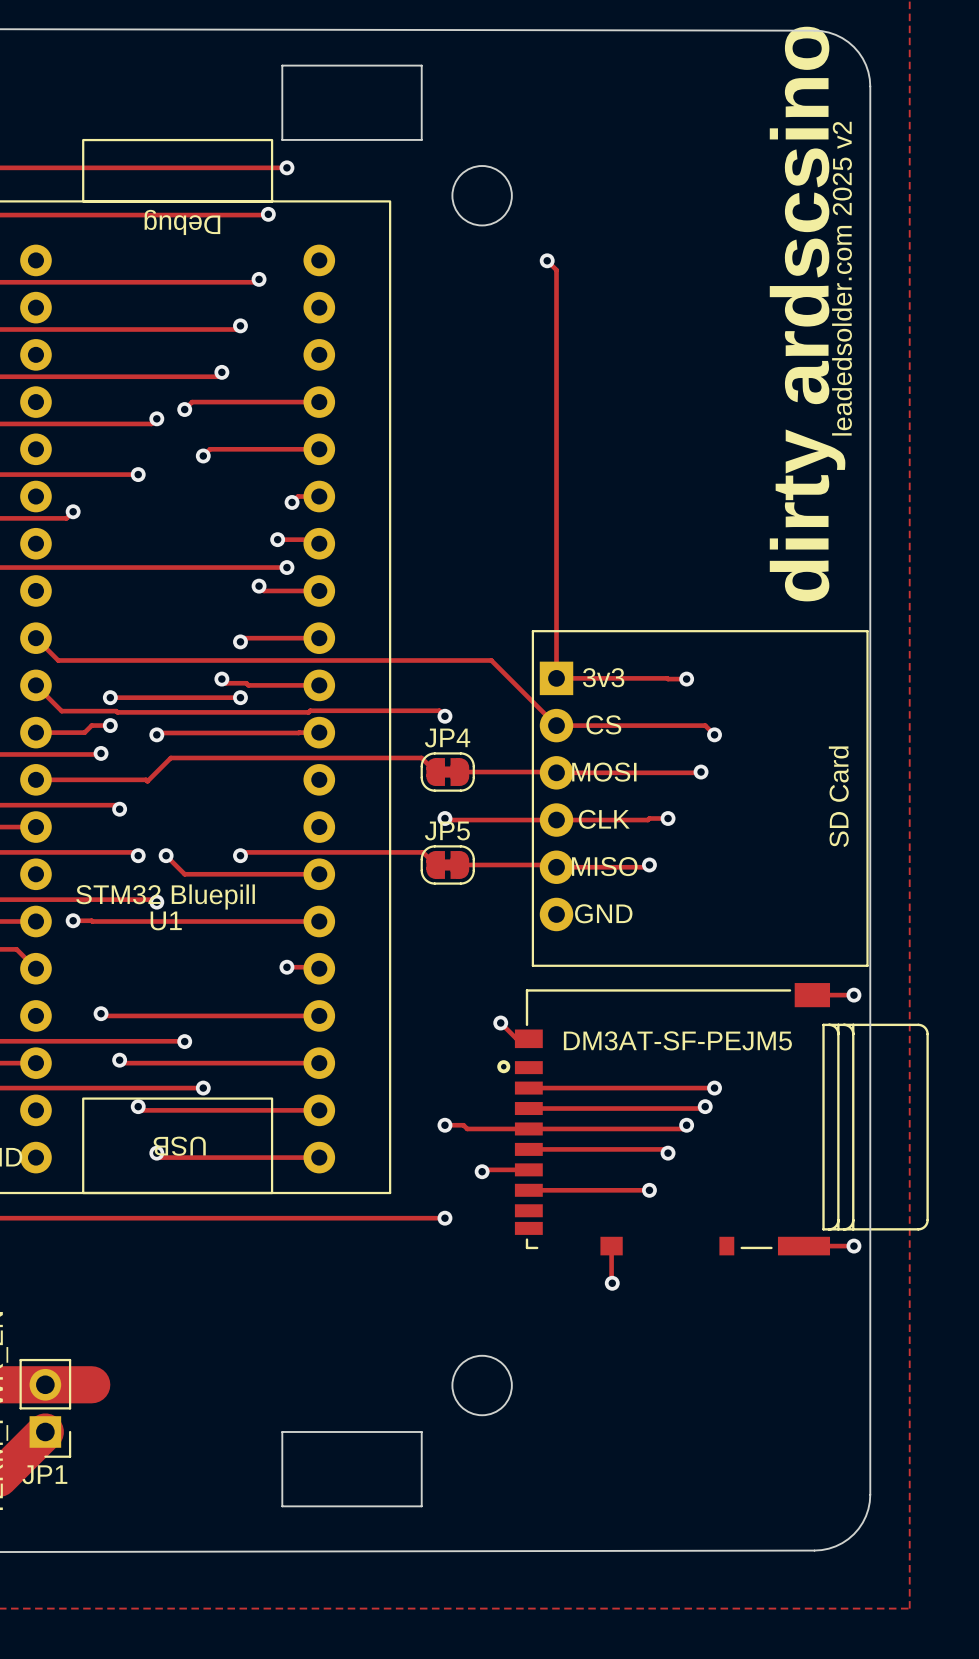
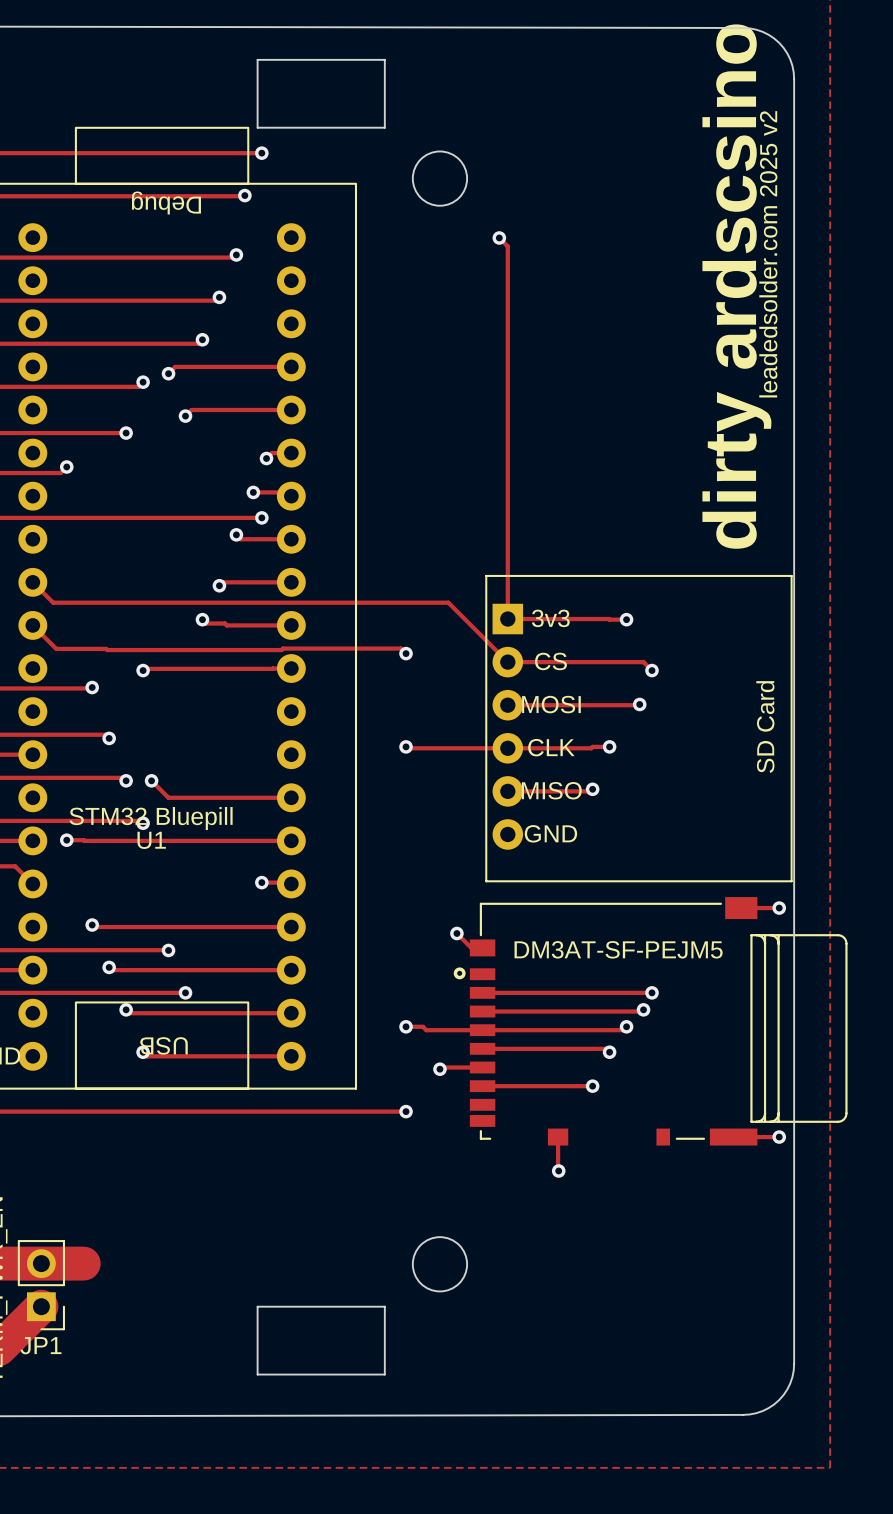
track: (110, 697) (240, 697) -> none
via: (110, 697) -> none
via: (240, 697) -> none
track: (110, 725) (91, 725) (84, 732) (35, 732) -> none
via: (110, 725) -> none
track: (435, 772) (421, 757) (170, 757) (147, 781) (35, 779) -> none
JP4: (447, 772) -> none
track: (459, 772) (556, 772) -> none
track: (240, 855) (243, 852) (423, 852) (435, 864) -> none
via: (240, 855) -> none
JP5: (447, 864) -> none
track: (459, 864) (554, 864) (556, 867) -> none

